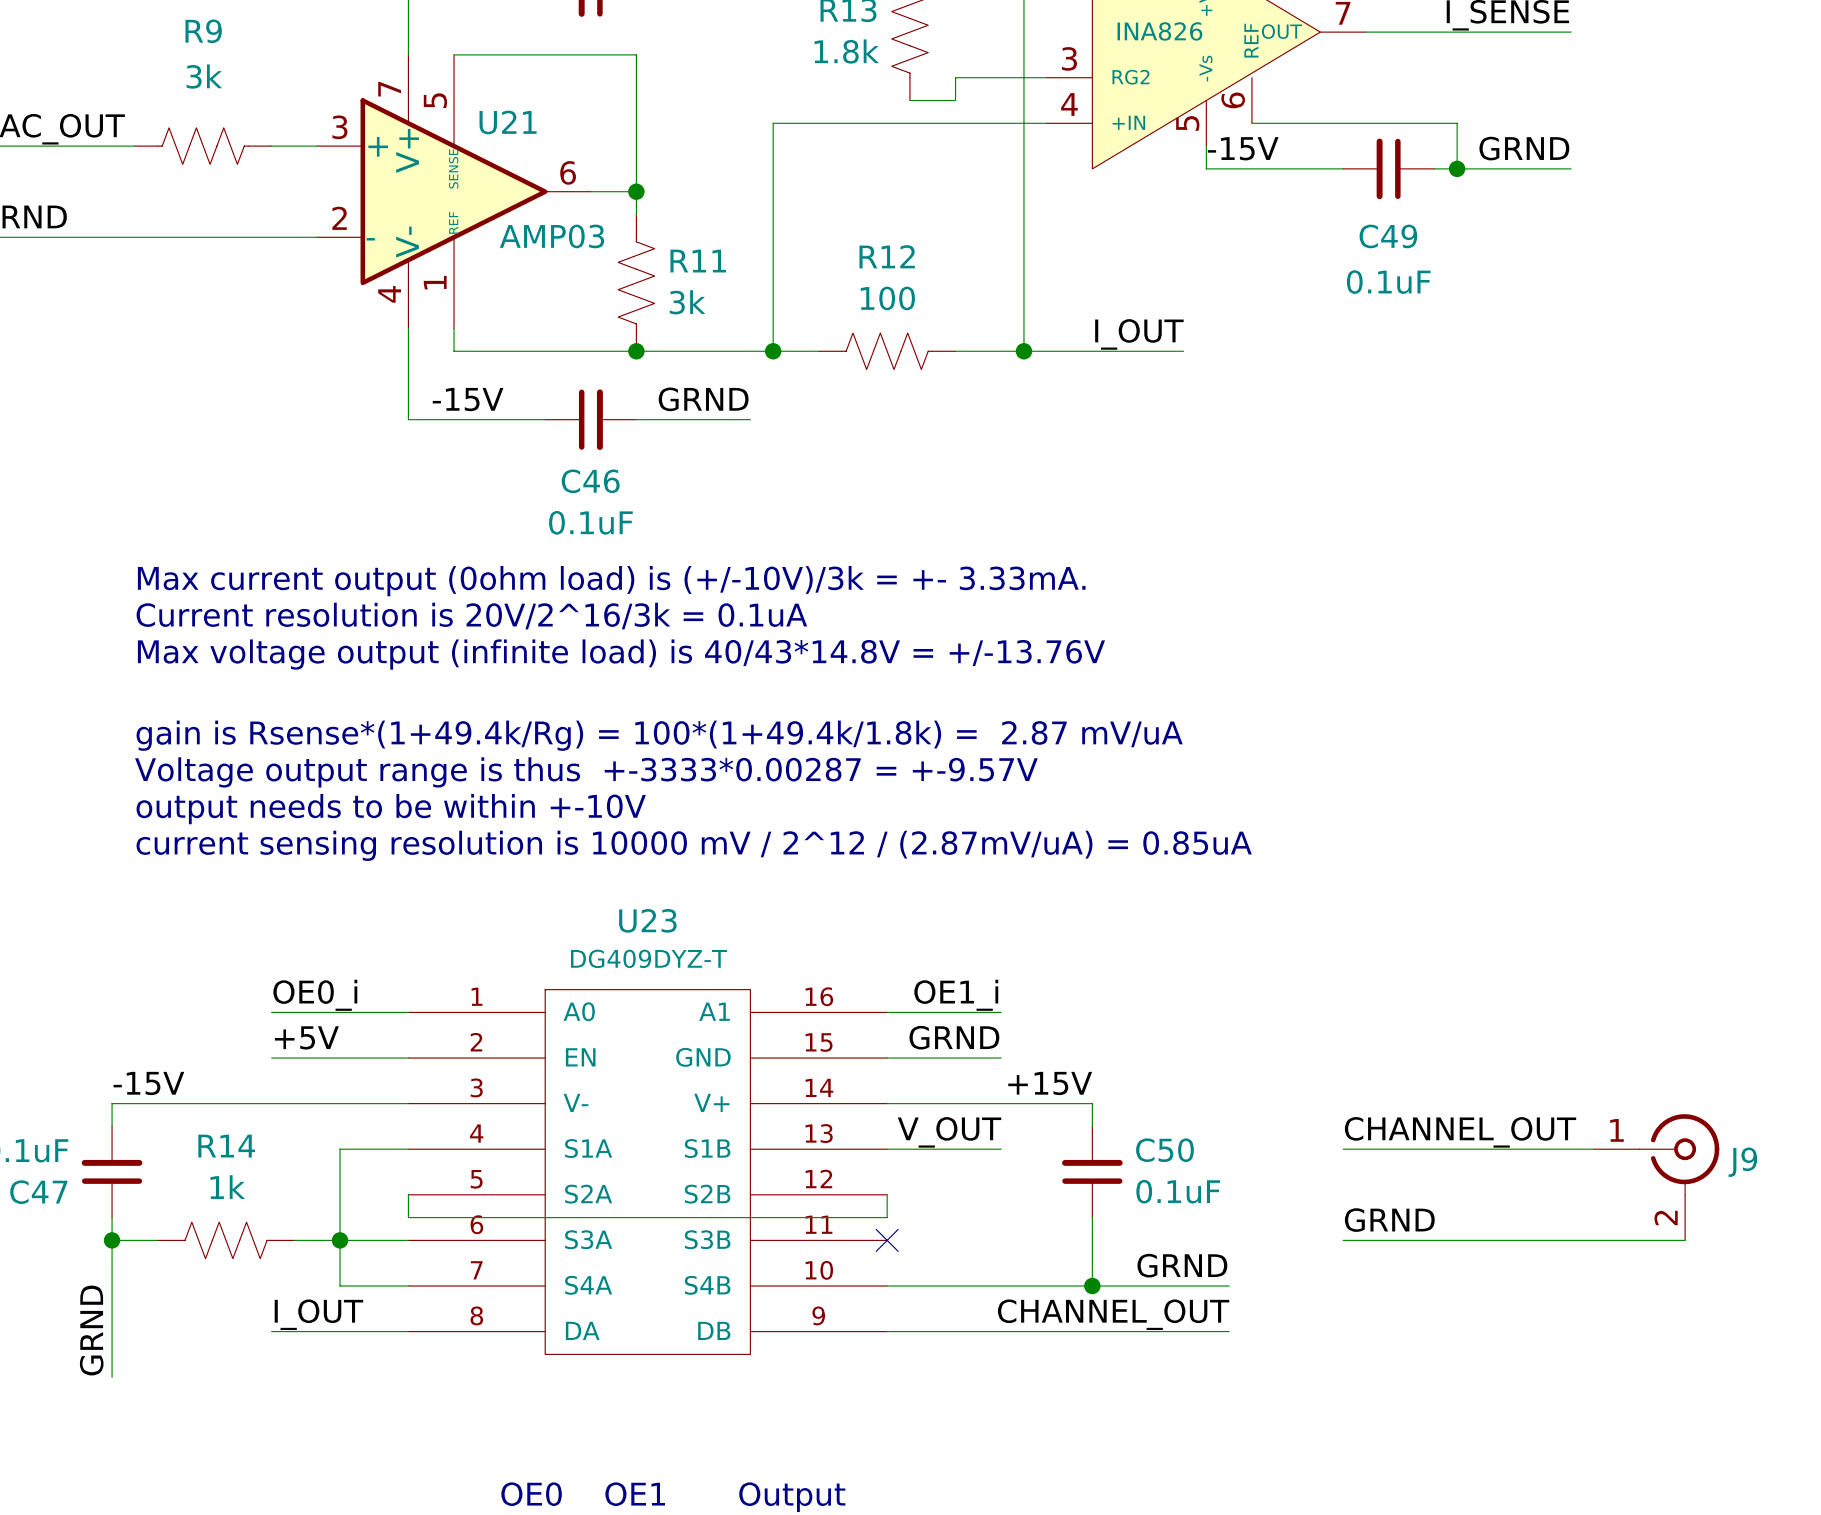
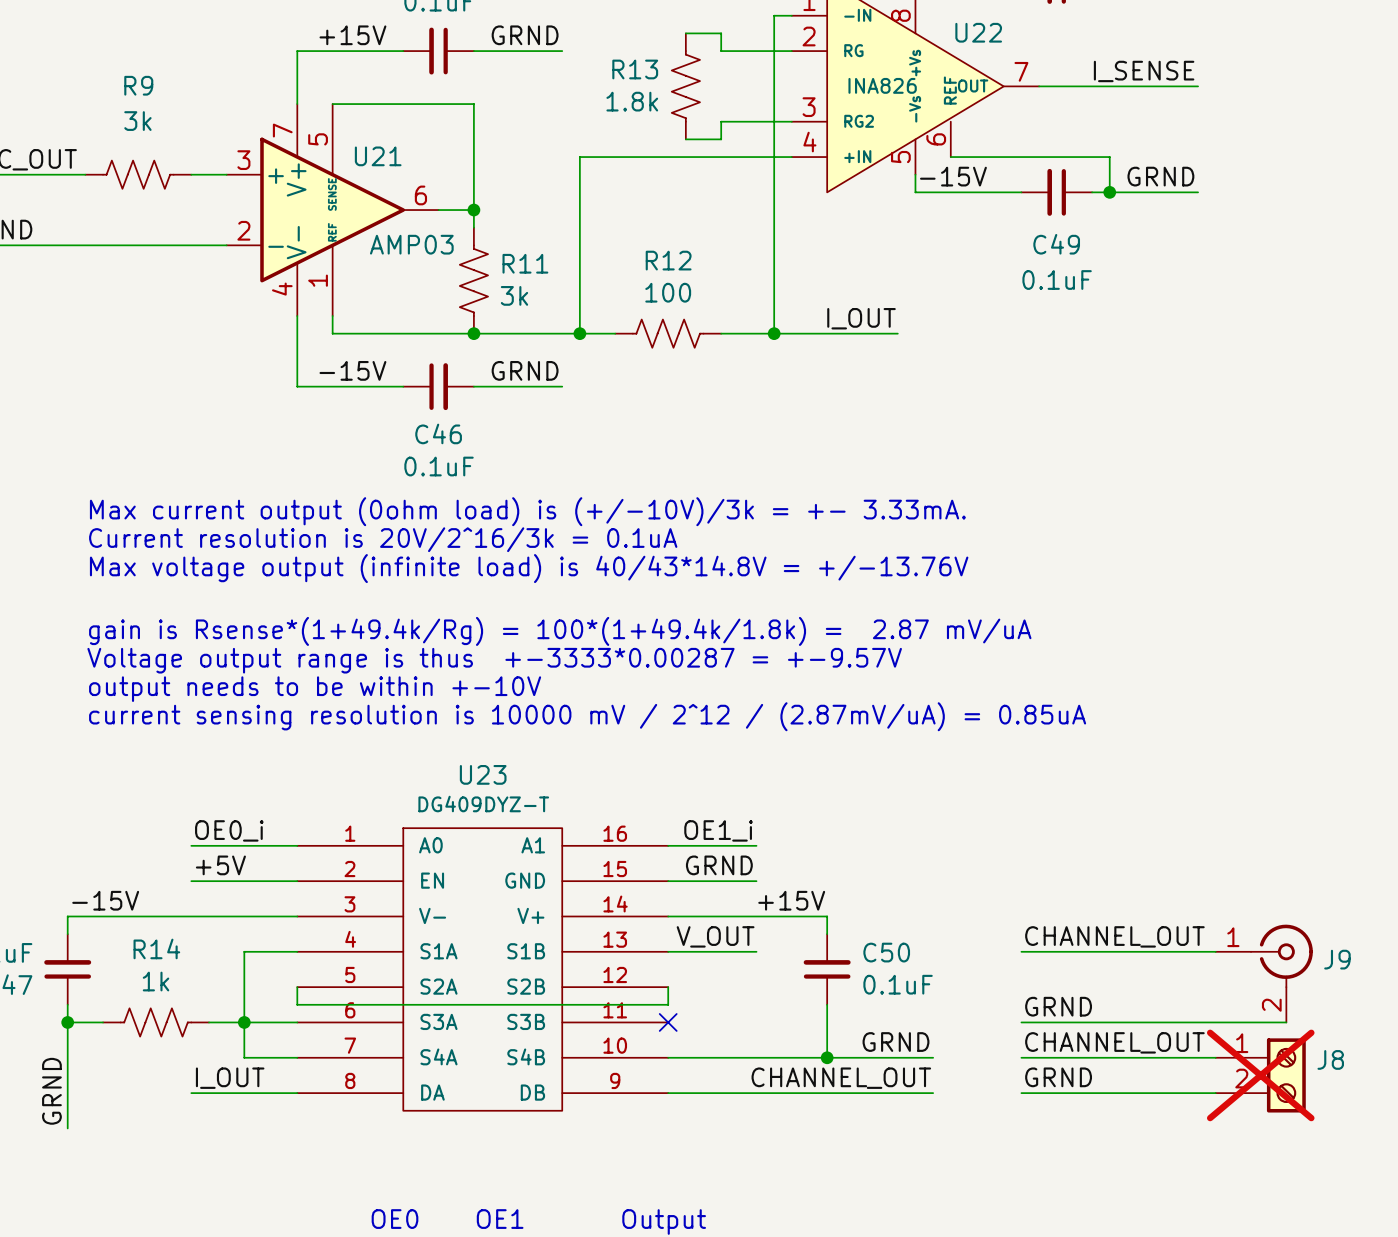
label: none -> CHANNEL_OUT (1114, 1042)
wire: none -> (1021, 1057) (1215, 1057)
J8: none -> (1260, 1075)
label: none -> GRND (1058, 1077)
wire: none -> (1021, 1093) (1215, 1093)

